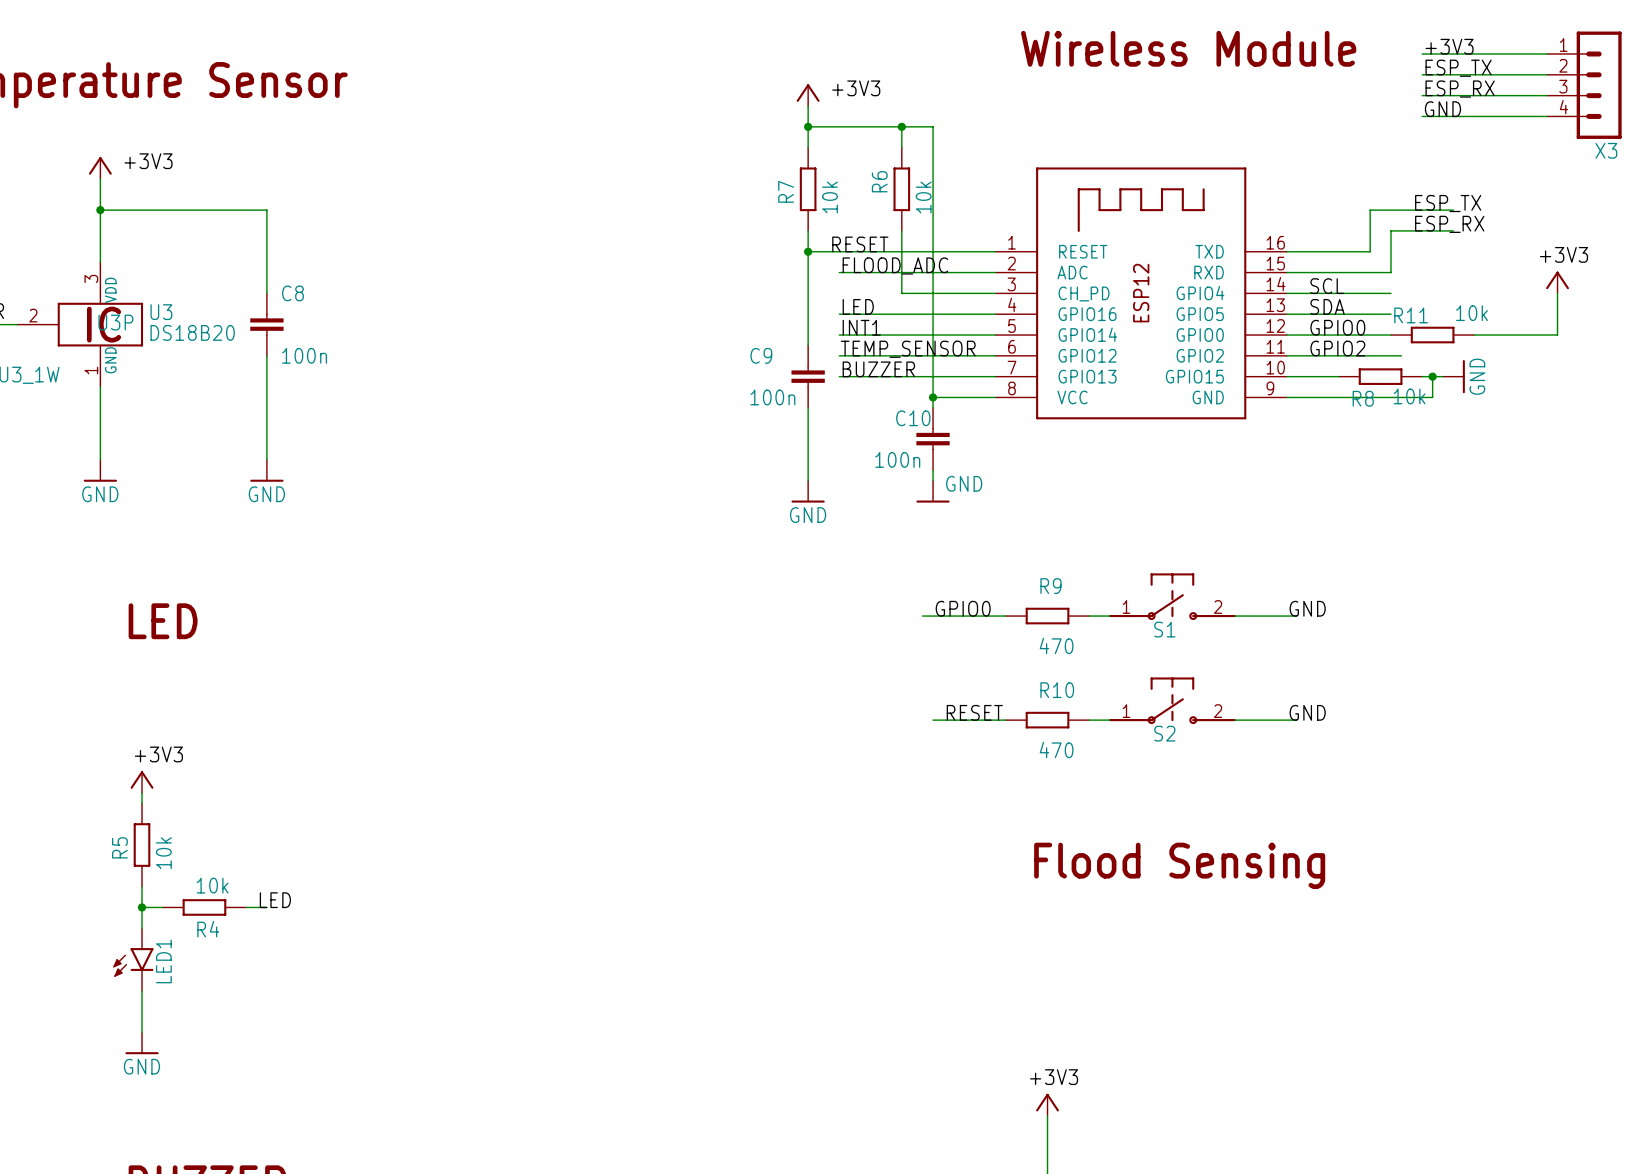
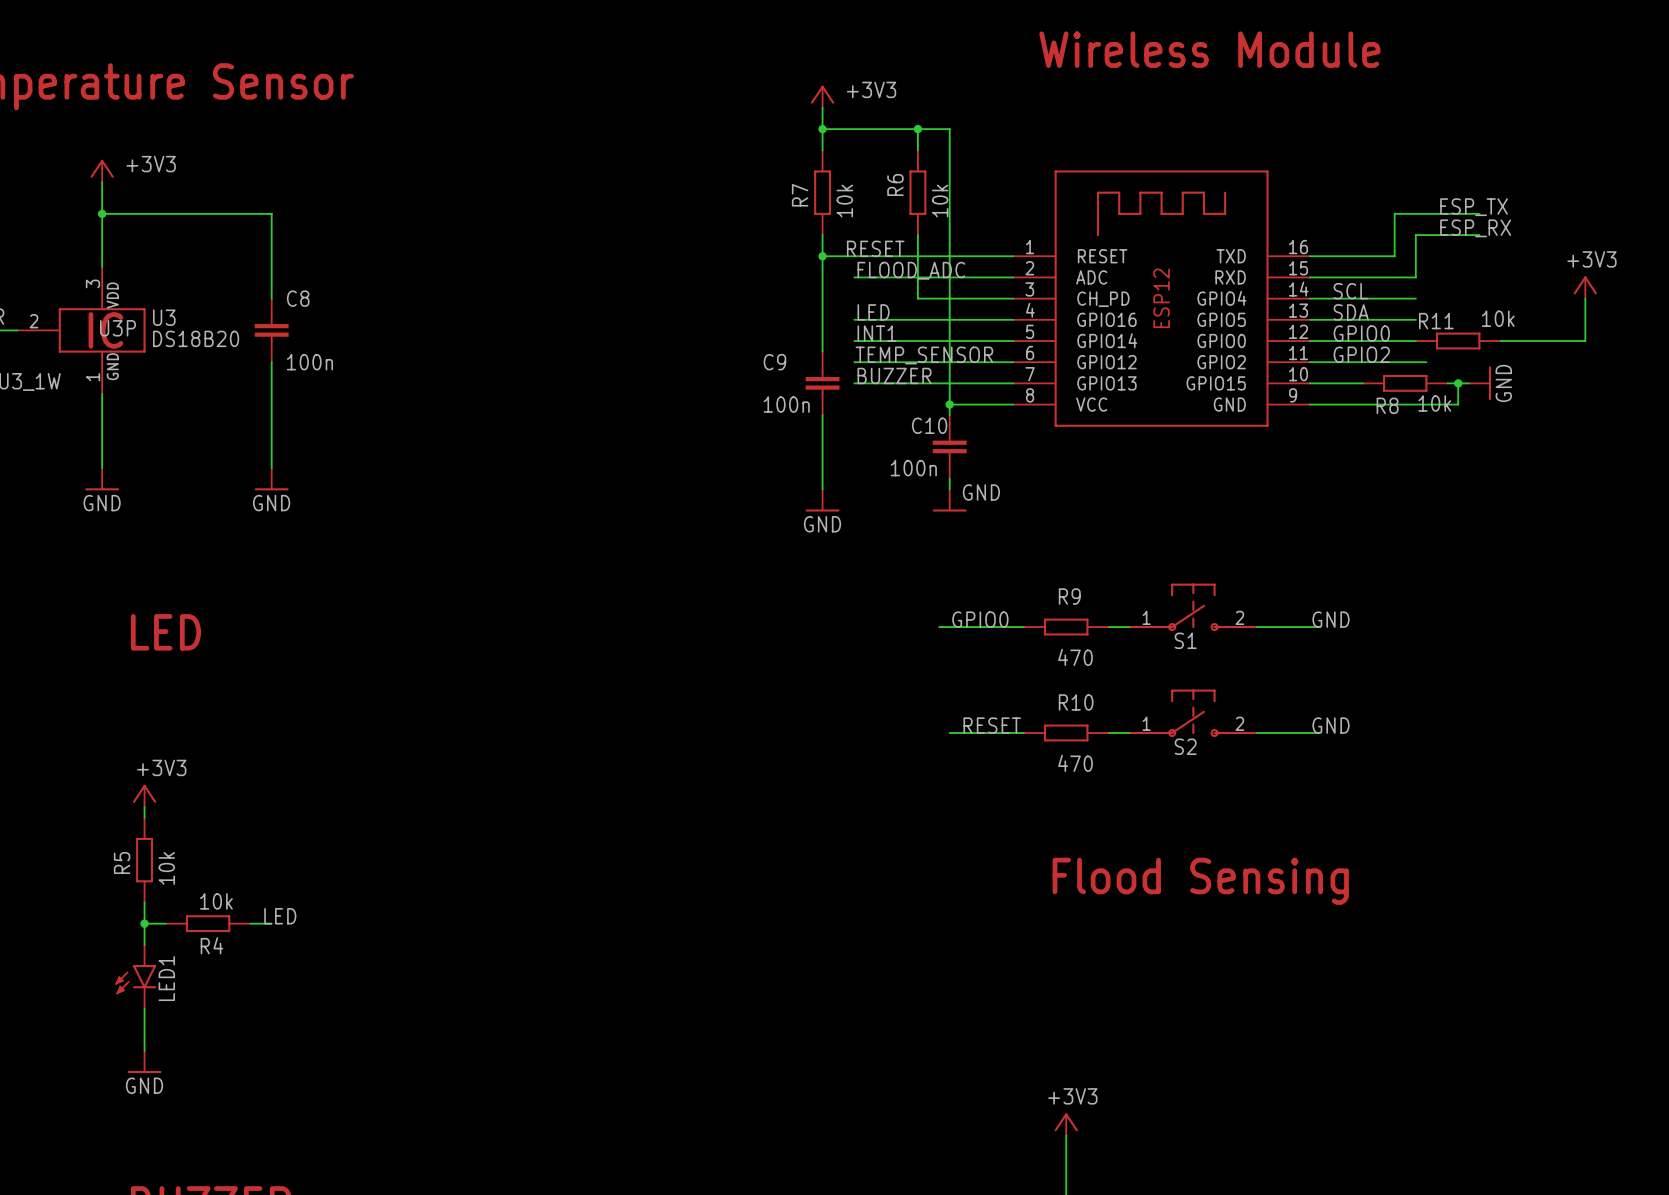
label: +3V3 (1449, 46) -> none
wire: (1422, 54) (1547, 54) -> none
label: ESP_TX (1458, 68) -> none
wire: (1422, 74) (1547, 74) -> none
X3: (1584, 85) -> none
label: ESP_RX (1460, 89) -> none
wire: (1422, 95) (1547, 95) -> none
label: GND (1442, 109) -> none
wire: (1422, 116) (1547, 116) -> none

